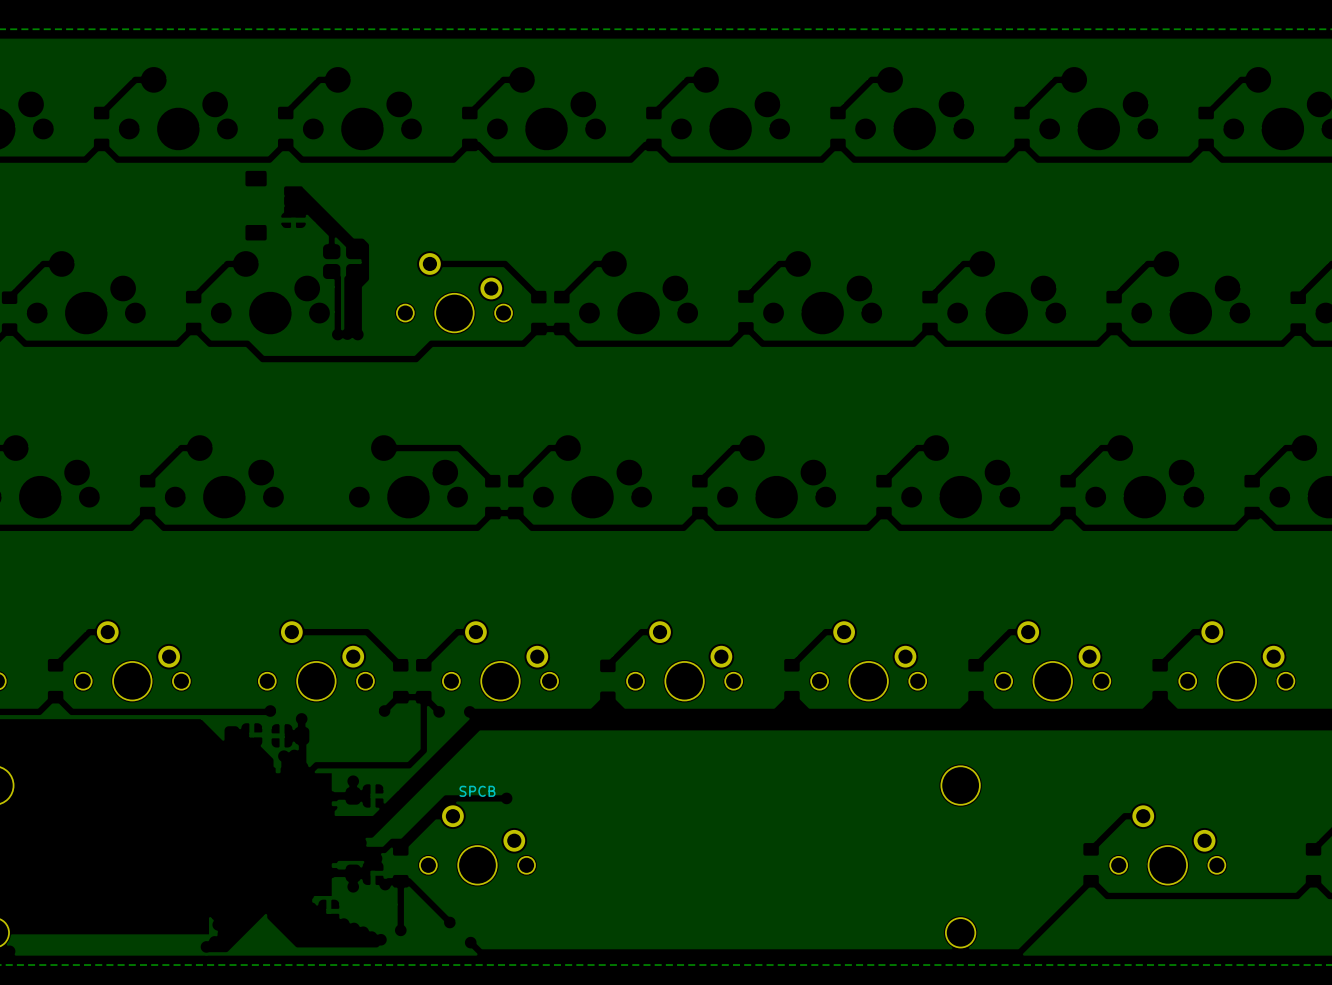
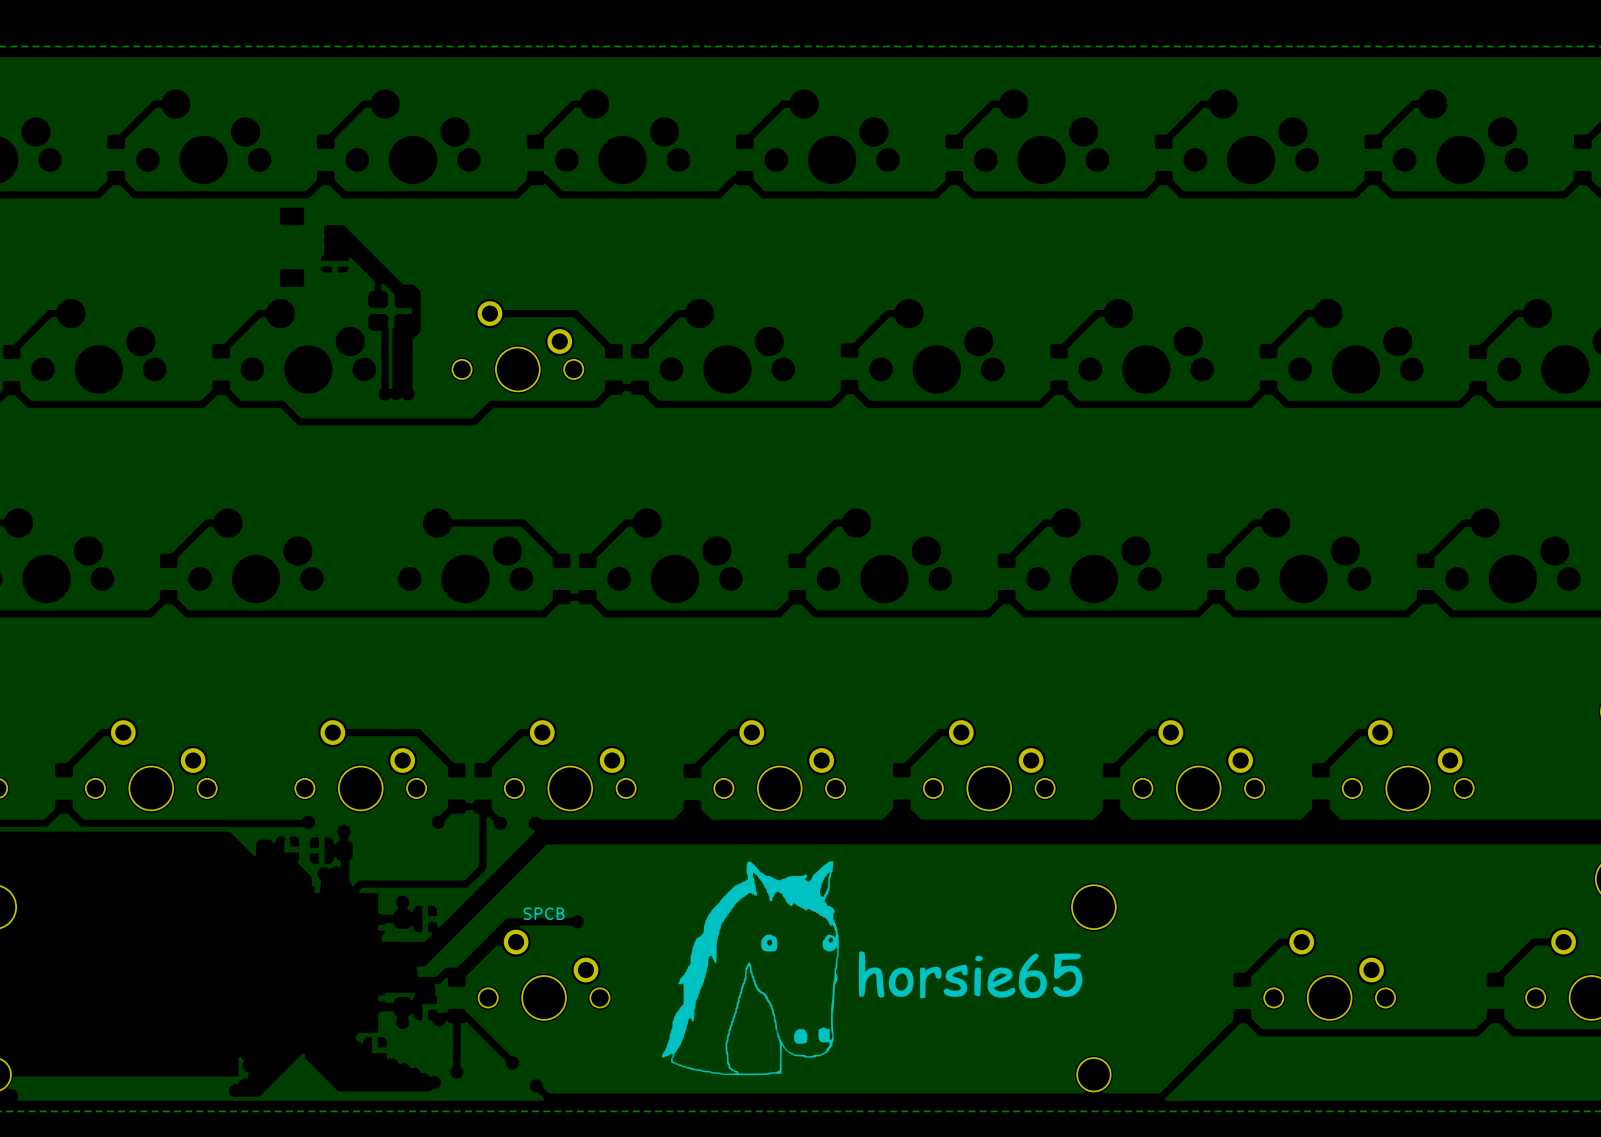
drawing: none -> [662, 861, 1083, 1076]

